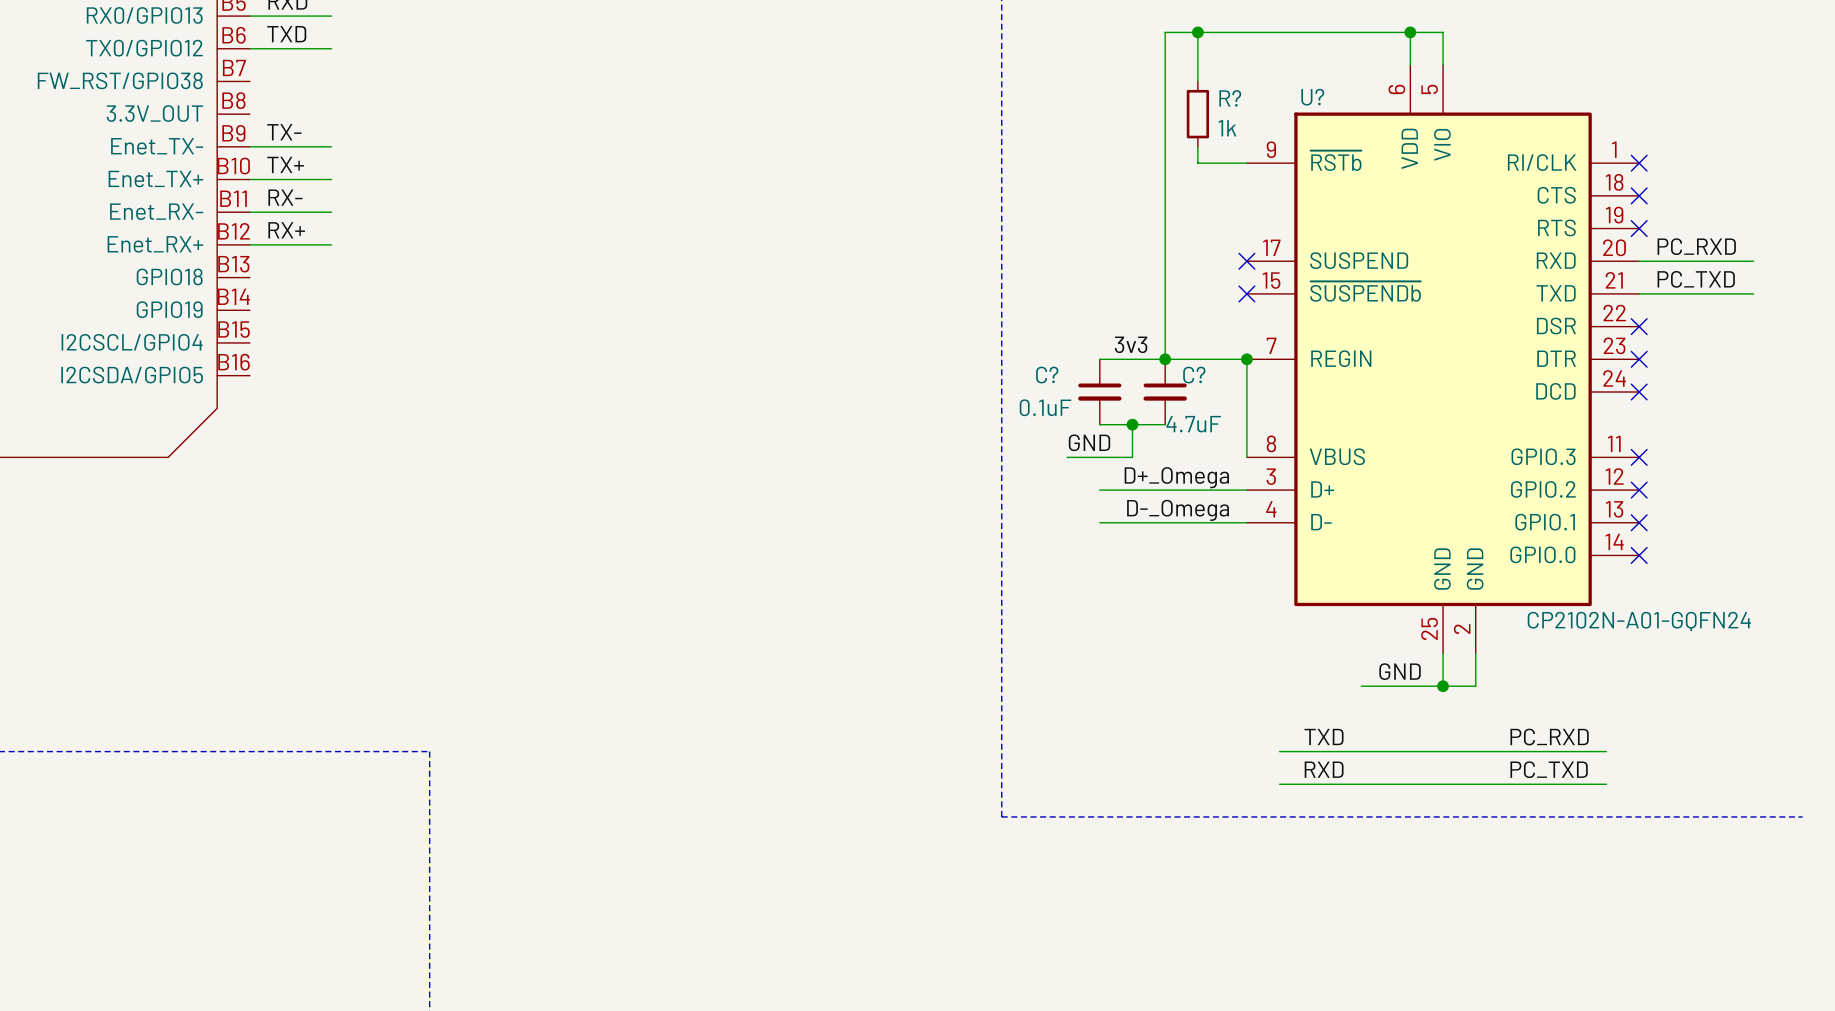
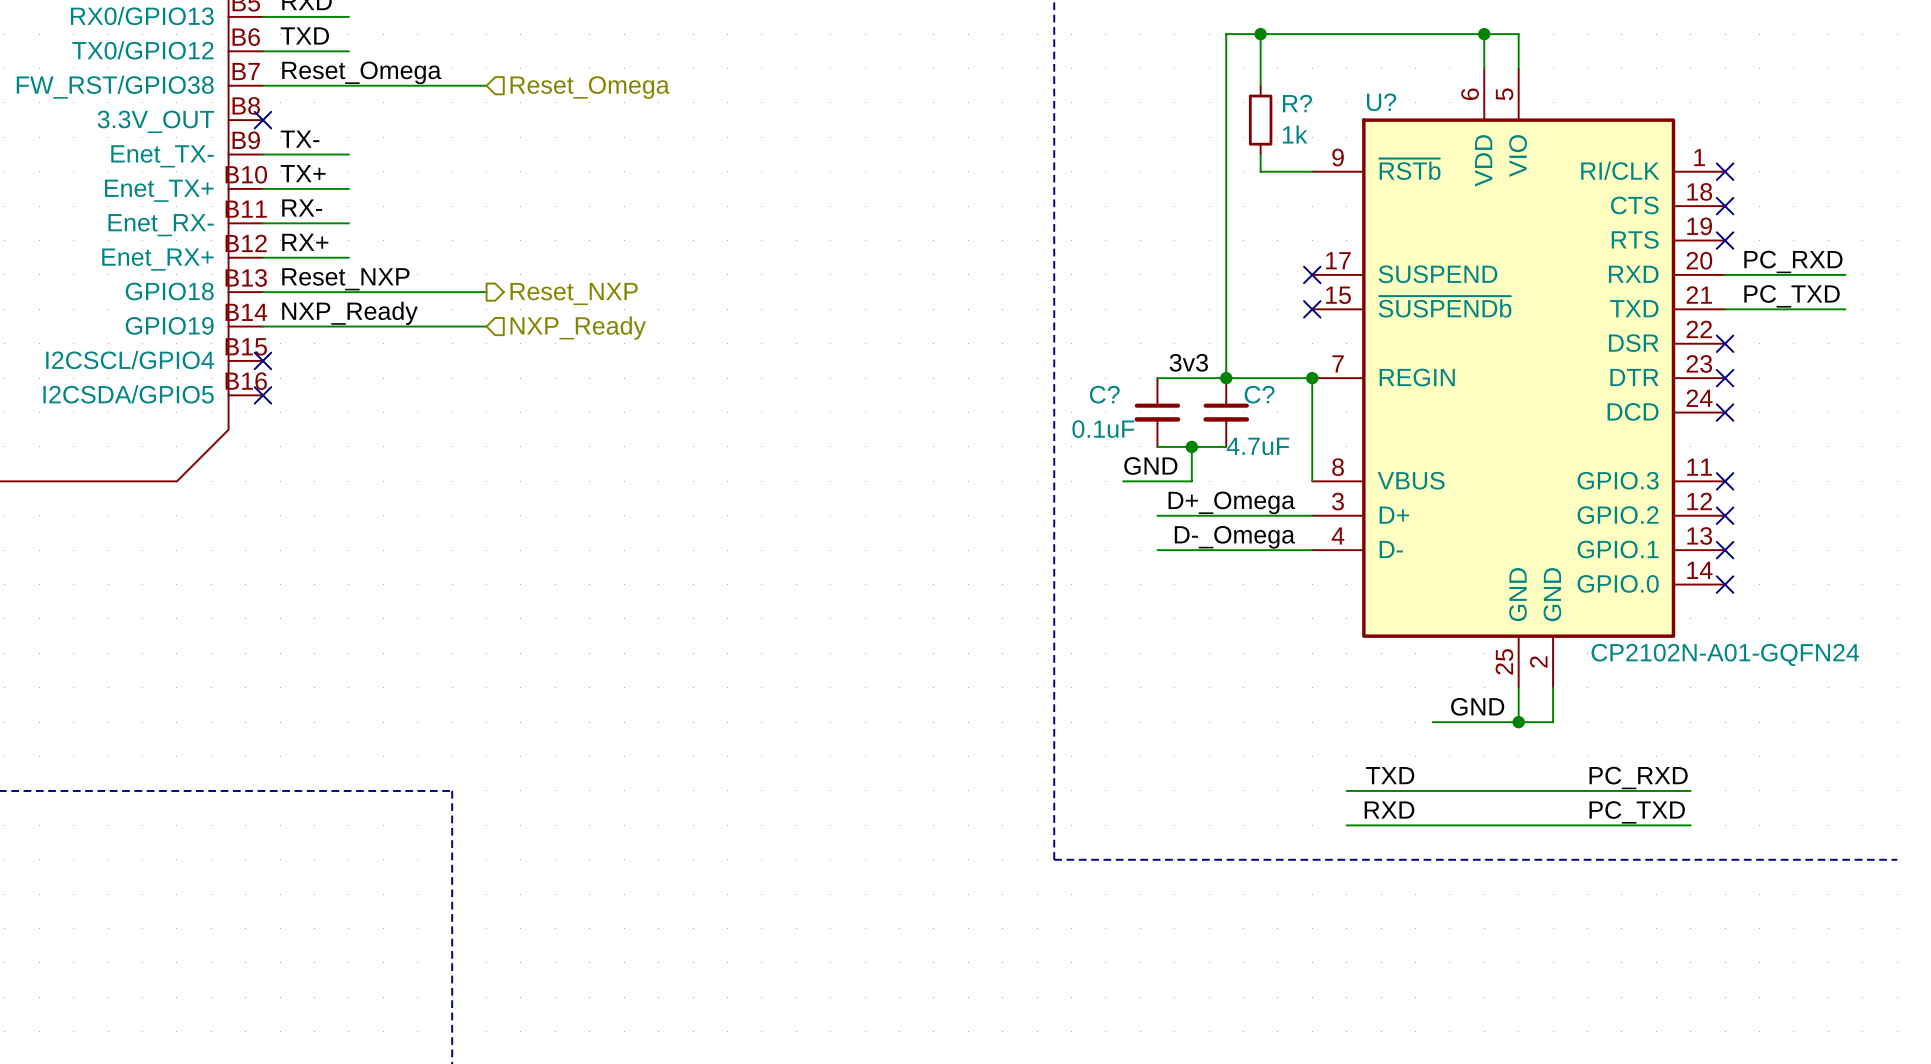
label: none -> Reset_Omega (361, 72)
wire: none -> (262, 85) (486, 85)
hierarchical label: none -> Reset_Omega (590, 87)
no-connect mark: none -> (262, 120)
label: none -> Reset_NXP (345, 279)
wire: none -> (262, 292) (486, 292)
hierarchical label: none -> Reset_NXP (574, 293)
label: none -> NXP_Ready (349, 313)
wire: none -> (262, 326) (486, 326)
hierarchical label: none -> NXP_Ready (578, 328)
no-connect mark: none -> (262, 360)
no-connect mark: none -> (262, 395)

